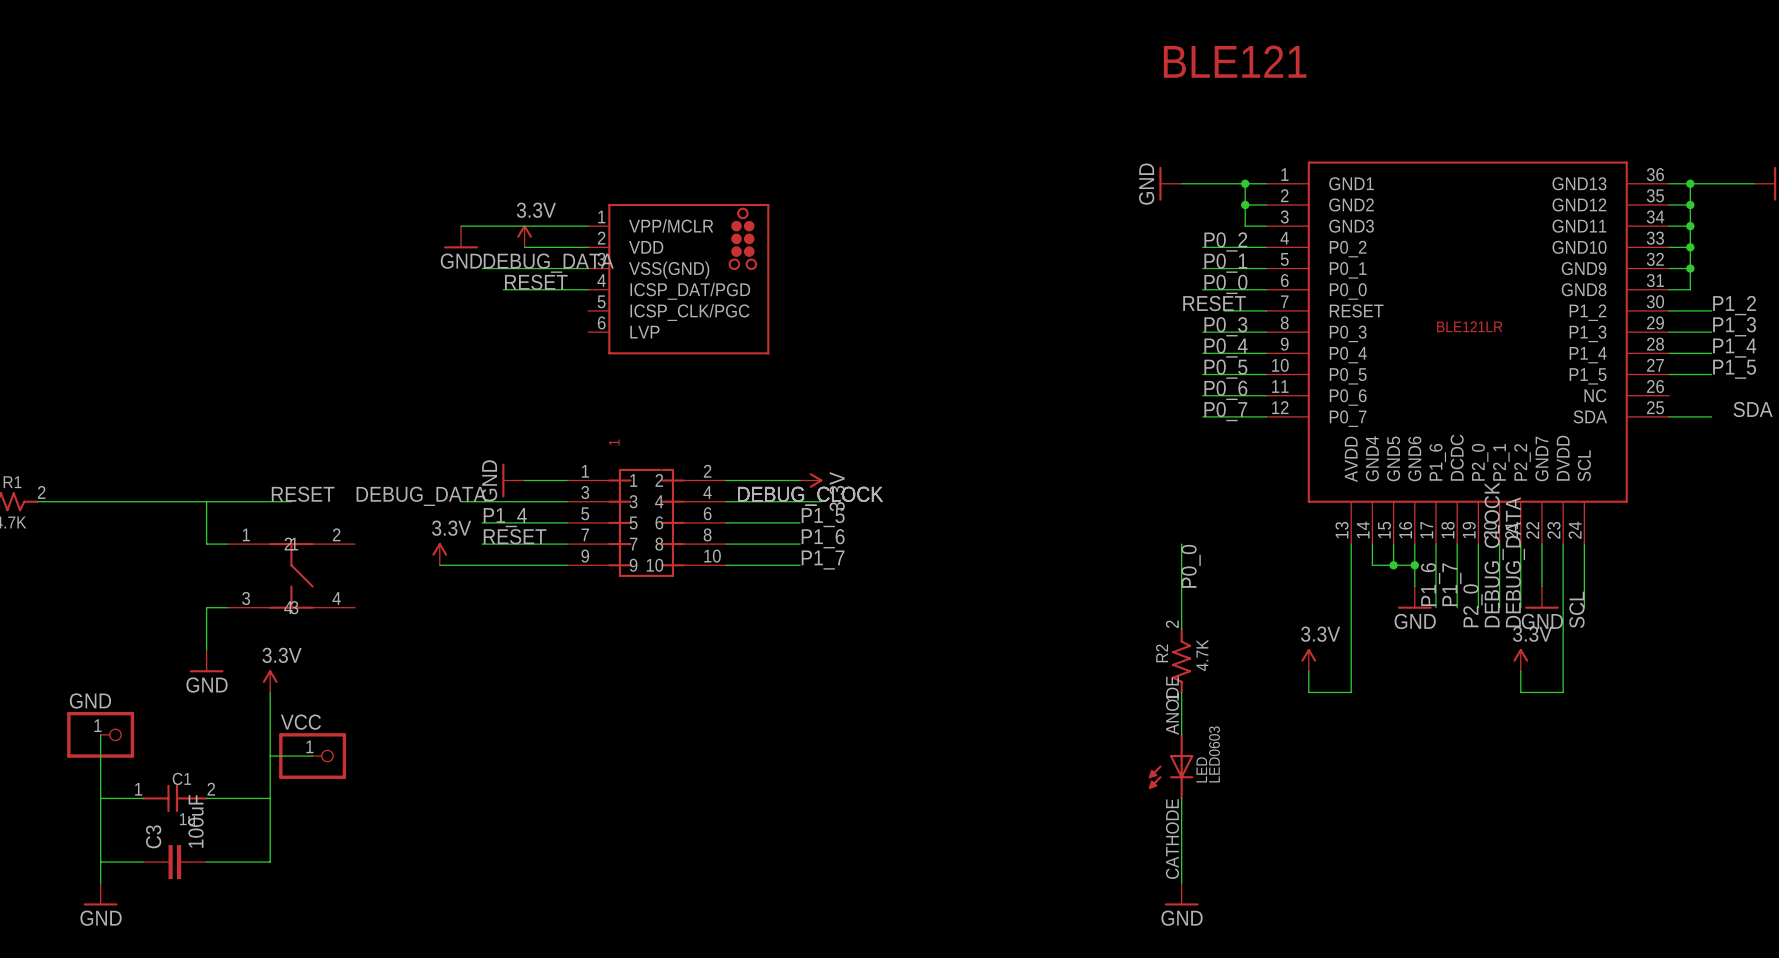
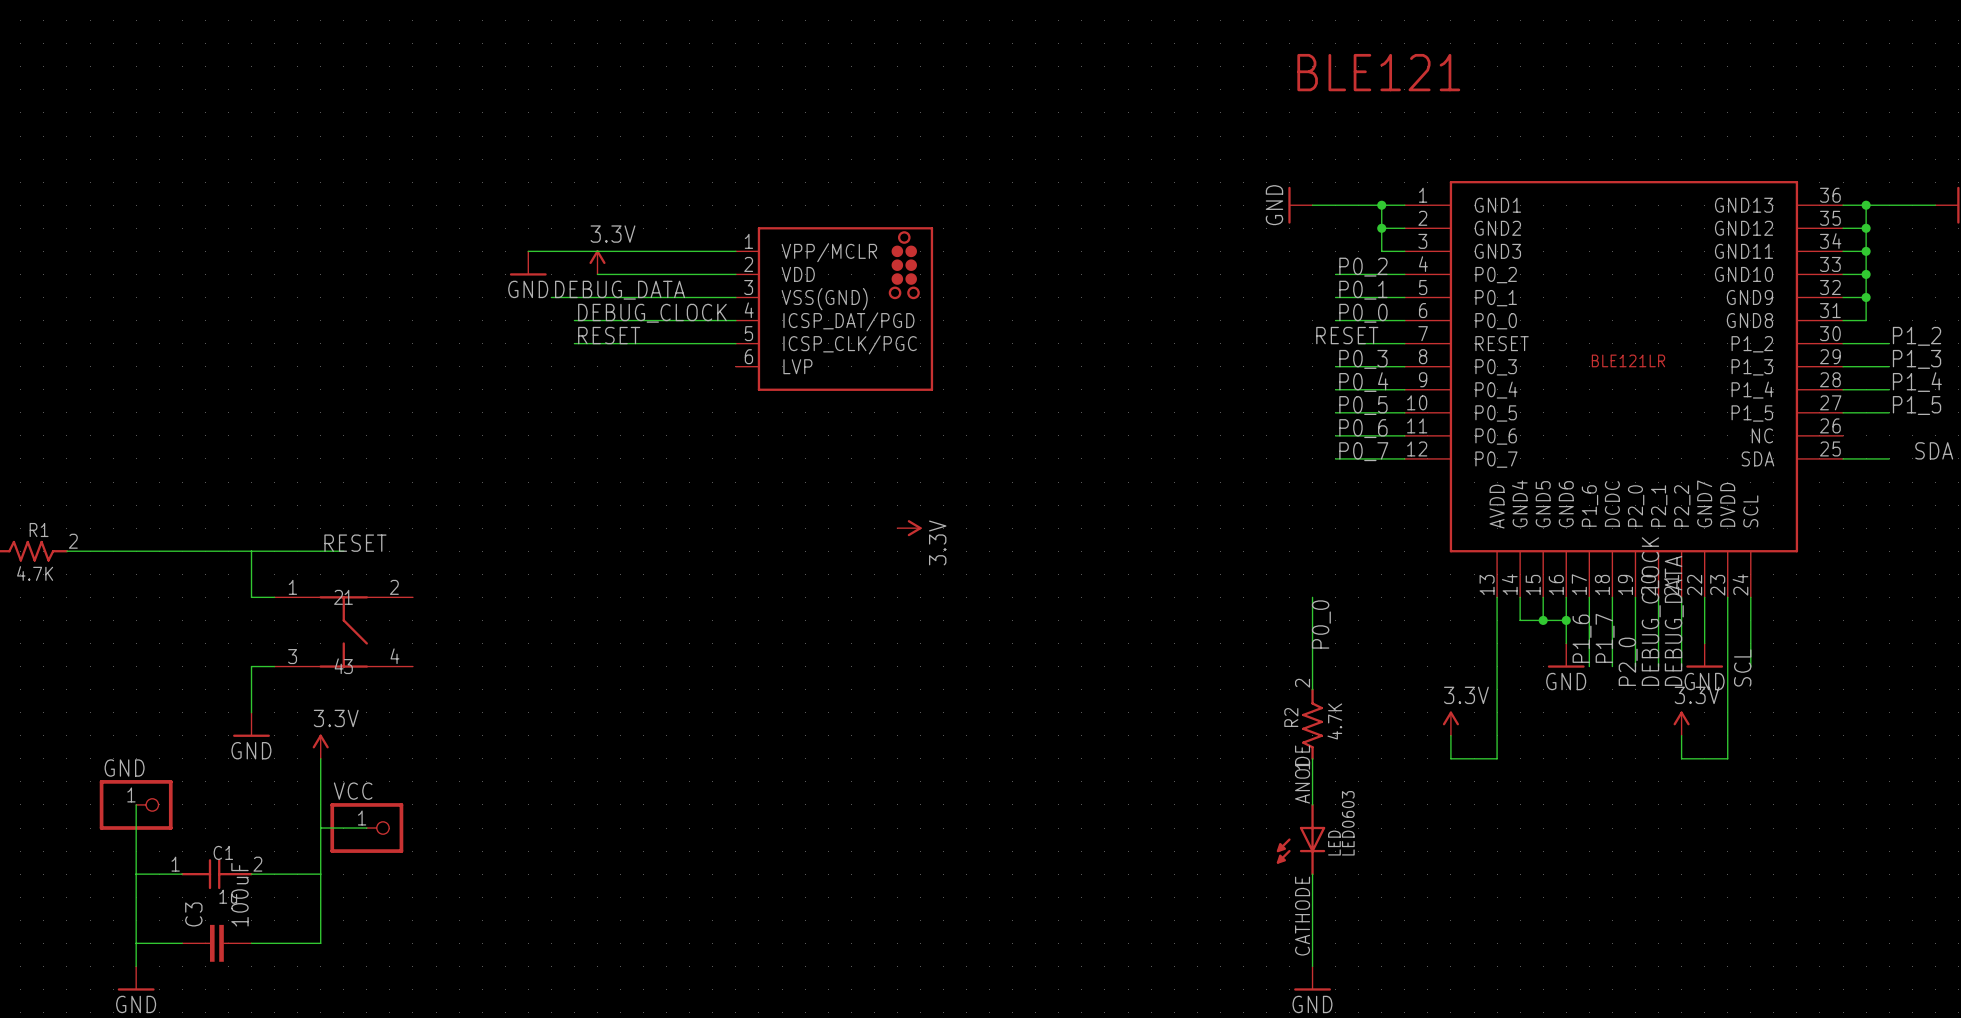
wire: none -> (666, 251) (735, 251)
wire: none -> (666, 274) (735, 274)
wire: none -> (666, 297) (735, 297)
part position: (678, 279) -> (834, 309)
label: RESET (536, 282) -> DEBUG_CLOCK (652, 313)
wire: none -> (666, 320) (735, 320)
label: none -> RESET (609, 335)
wire: none -> (574, 343) (735, 343)
power symbol: GND (513, 480) -> none
wire: (524, 480) (566, 480) -> none
wire: (725, 480) (800, 480) -> none
label: DEBUG_DATA (421, 496) -> none
label: DEBUG_CLOCK (810, 496) -> none
wire: (460, 501) (566, 501) -> none
wire: (725, 501) (821, 501) -> none
label: P1_4 (505, 517) -> none
label: P1_5 (823, 517) -> none
wire: (482, 522) (566, 522) -> none
part: (646, 522) -> none
wire: (725, 522) (800, 522) -> none
label: RESET (515, 536) -> none
label: P1_6 (823, 538) -> none
wire: (482, 544) (566, 544) -> none
wire: (725, 544) (800, 544) -> none
power symbol: 3.3V (439, 554) -> none
label: P1_7 (823, 560) -> none
wire: (439, 565) (566, 565) -> none
wire: (725, 565) (800, 565) -> none

